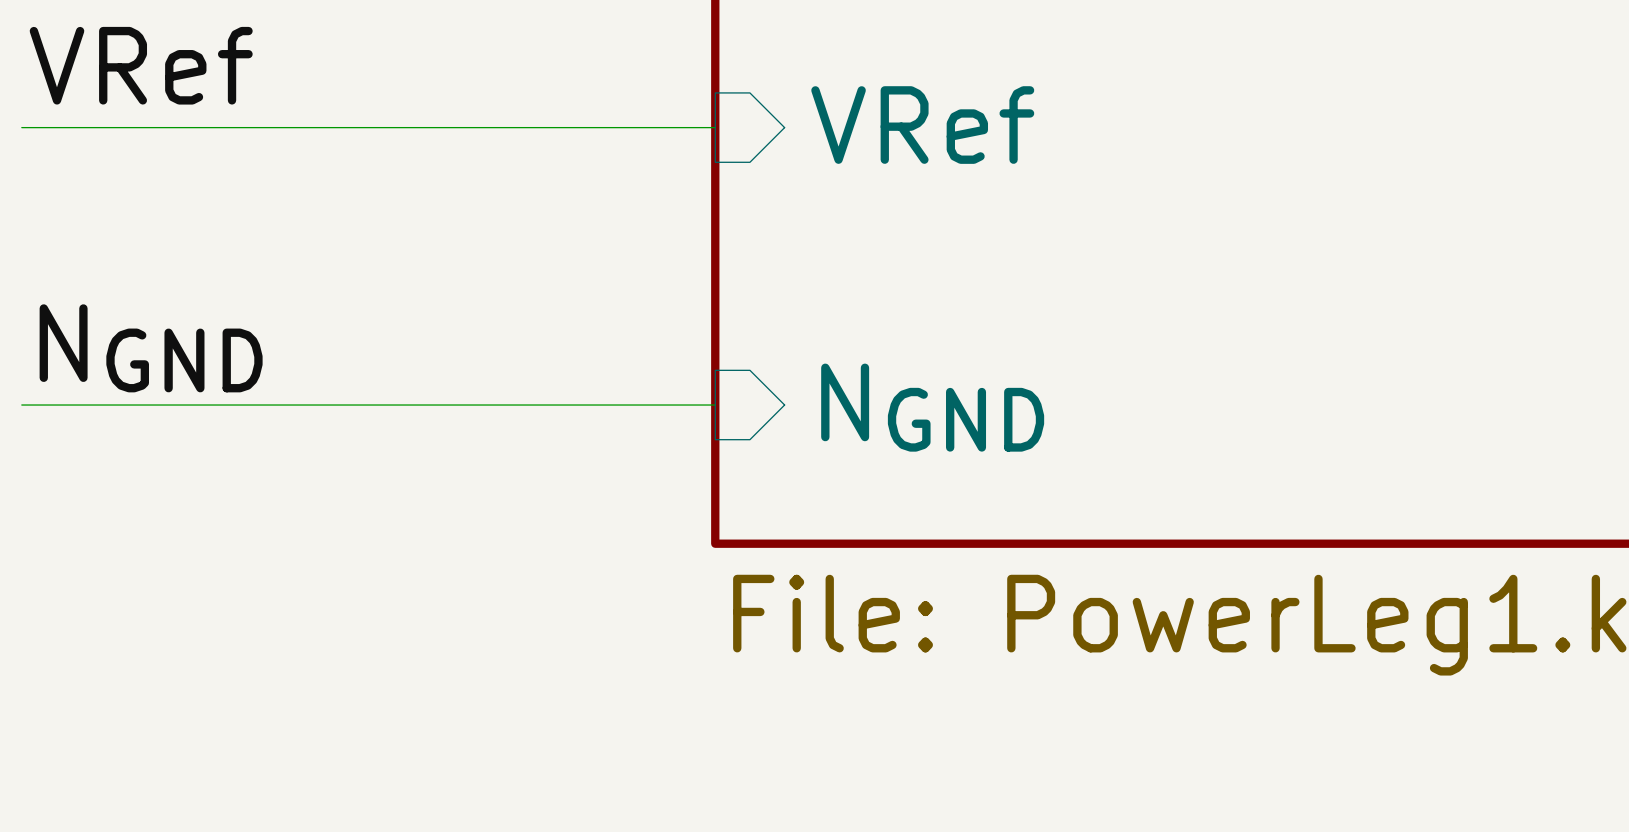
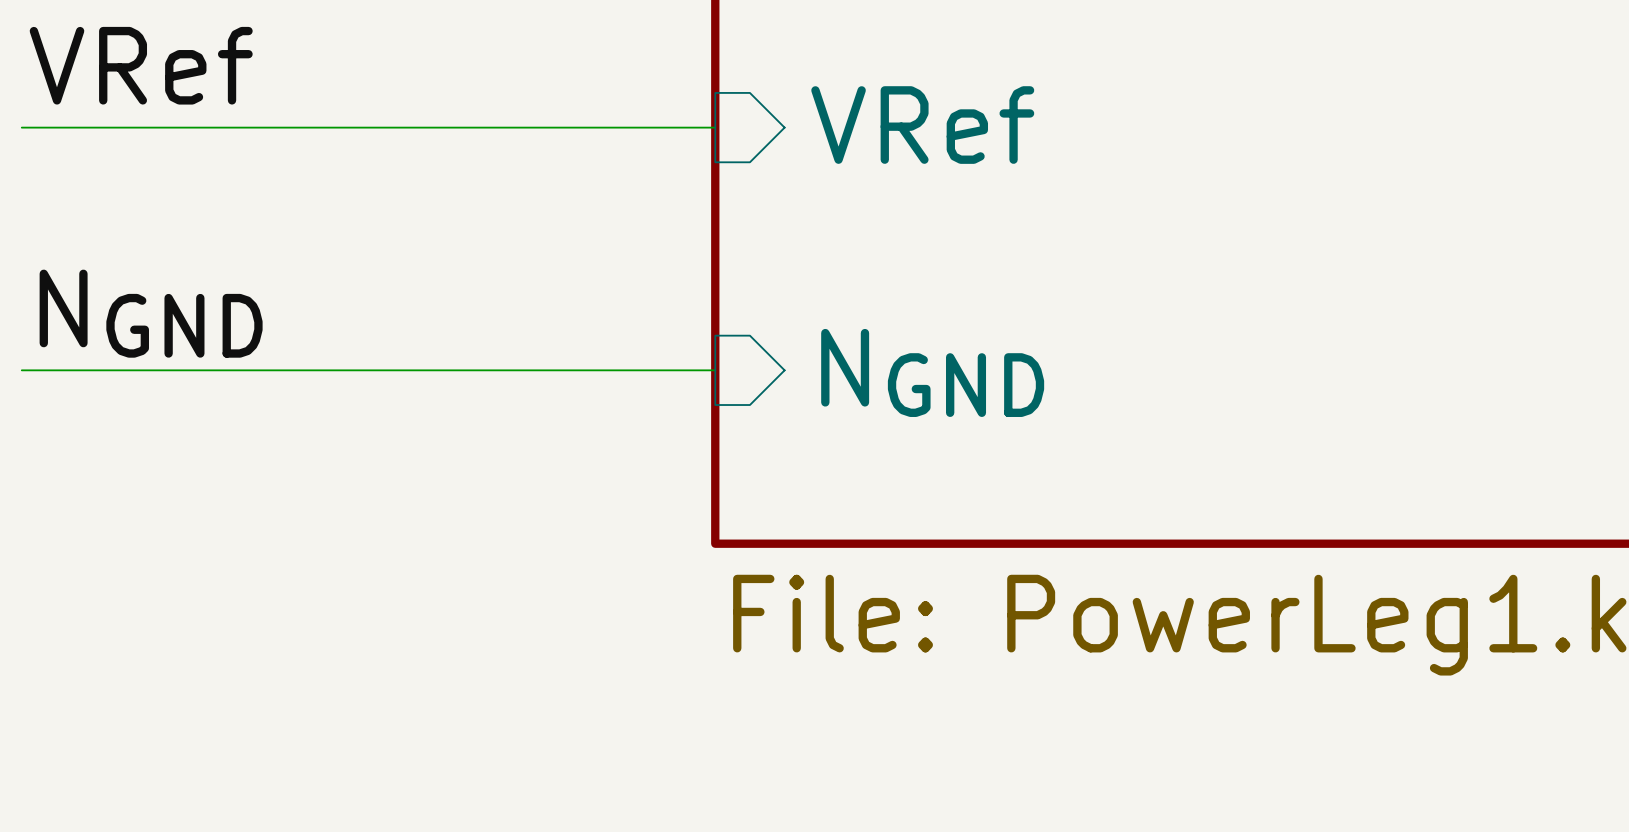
label position: NGND (151, 348) -> NGND (151, 313)
wire: (21, 405) (715, 405) -> (21, 370) (715, 370)
sheet pin position: NGND (932, 407) -> NGND (932, 372)

